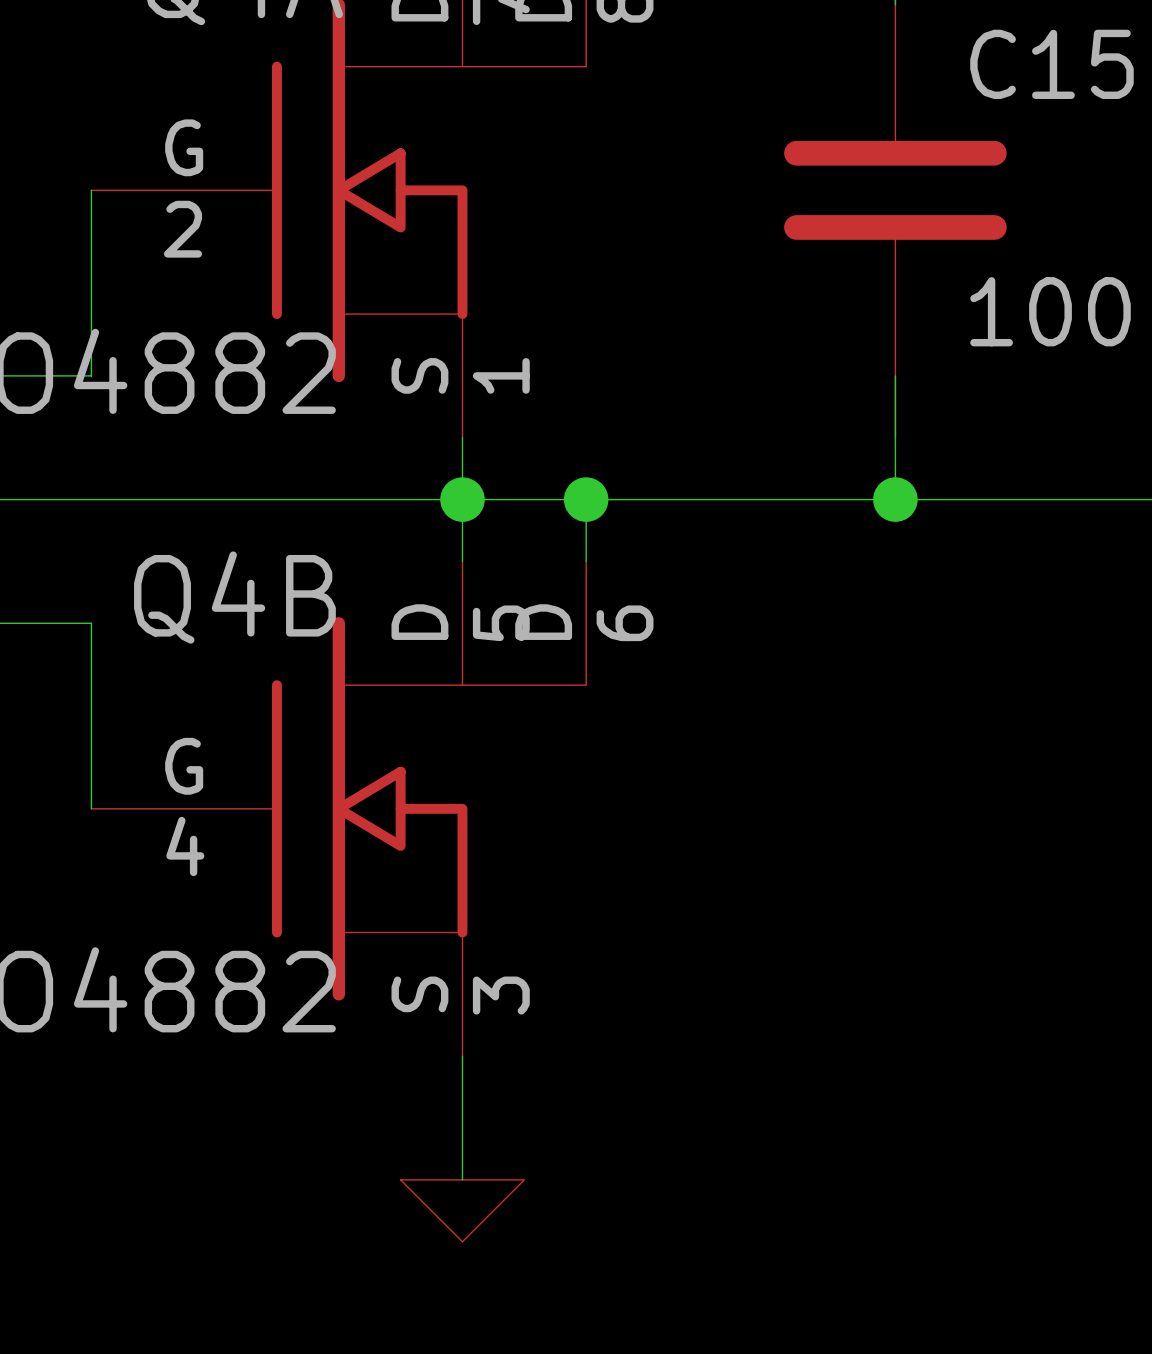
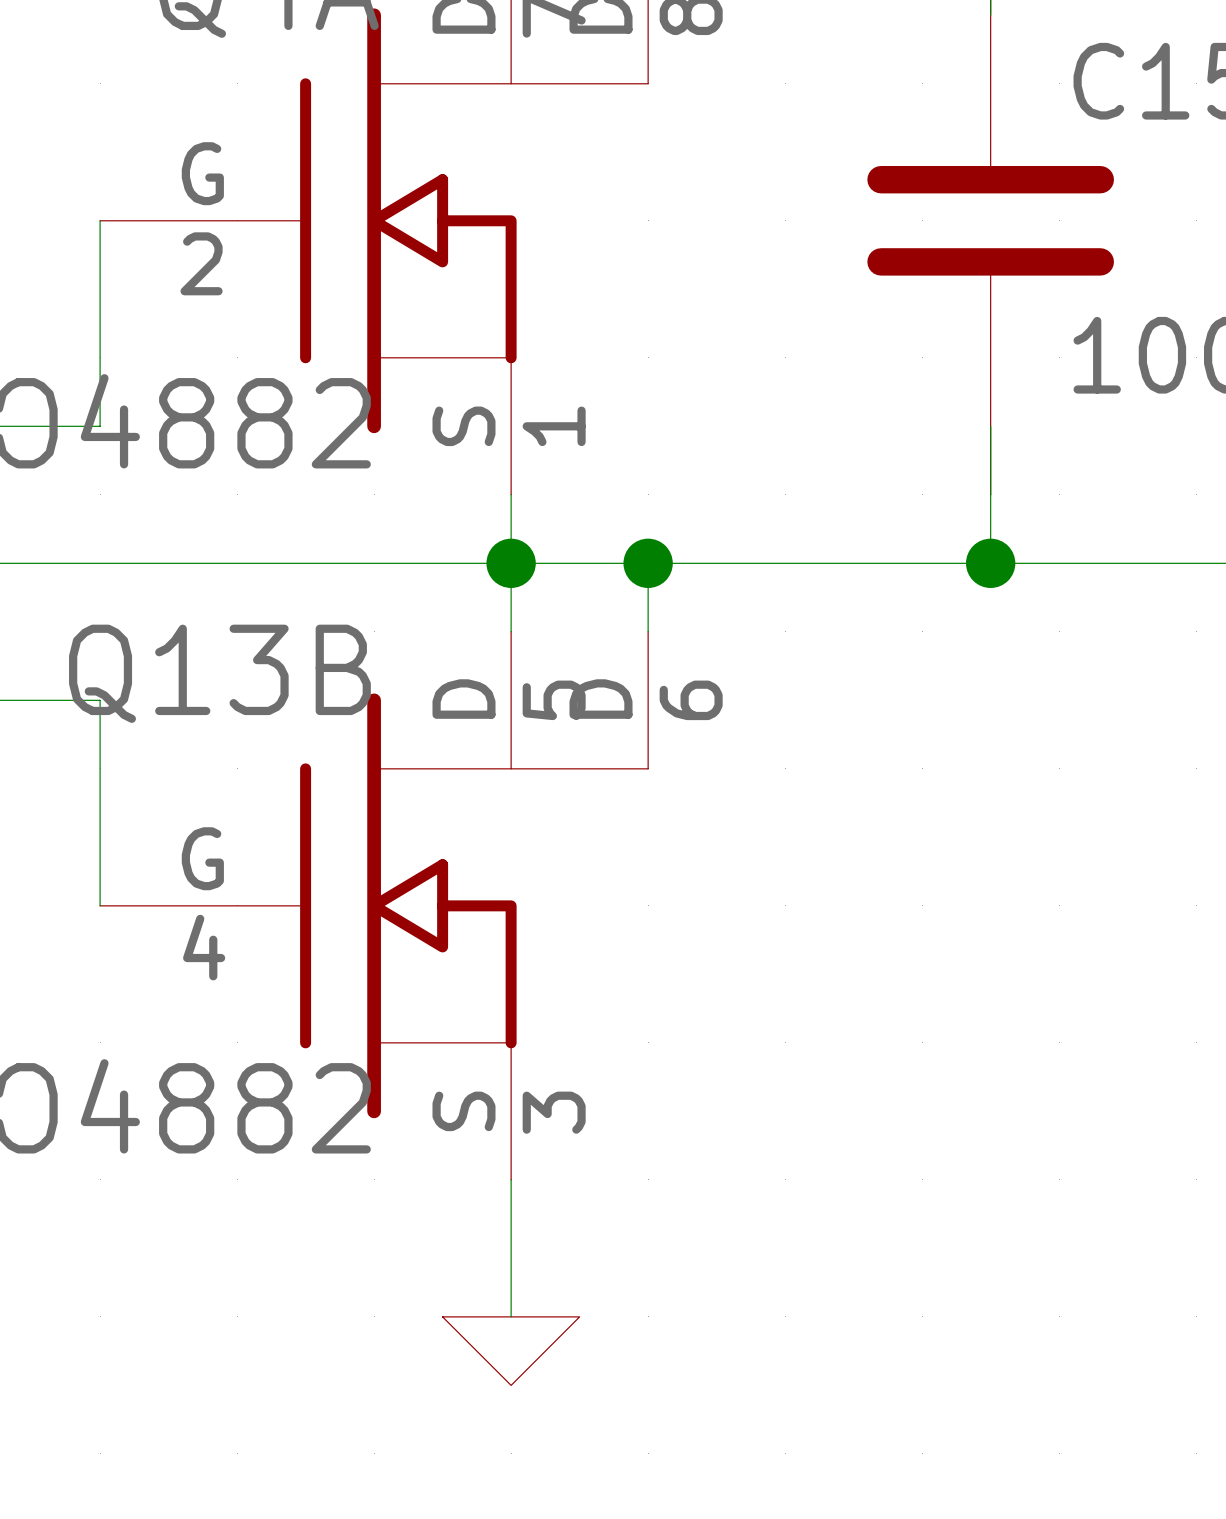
Q4B name: Q4B (234, 597) -> Q13B (219, 673)

